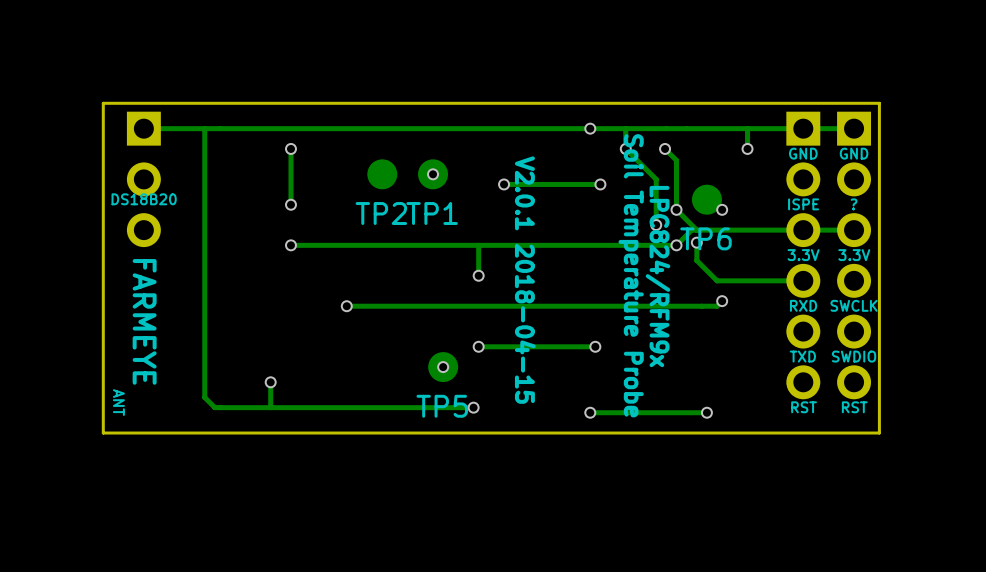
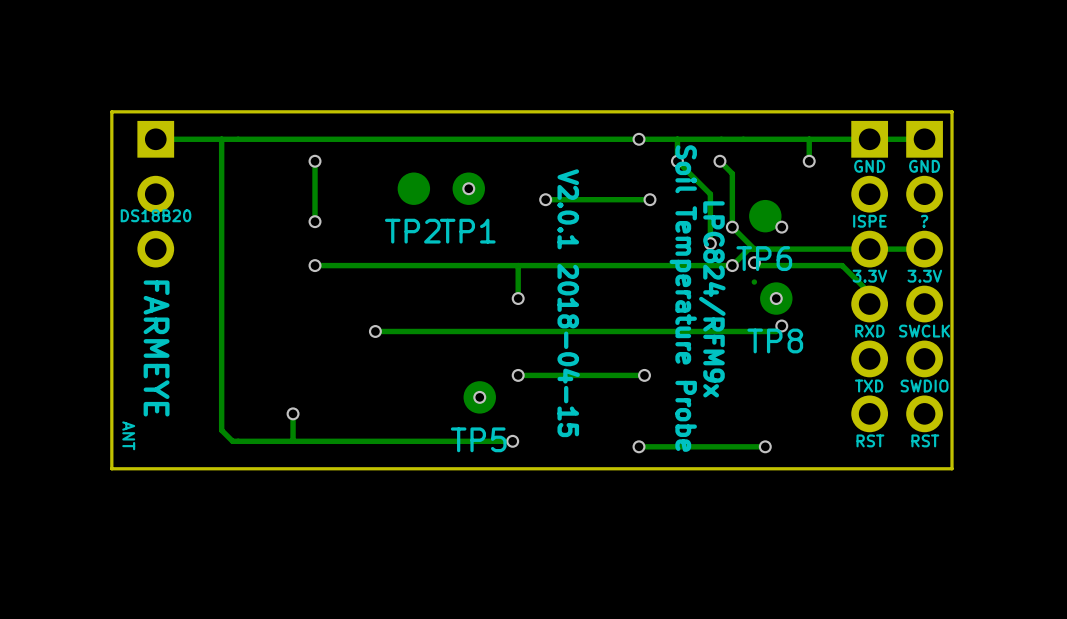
track: (696, 242) (696, 260) (717, 280) (803, 280) -> (759, 265) (842, 265) (869, 293) (869, 304)
TP8: none -> (776, 298)
via: none -> (776, 298)

